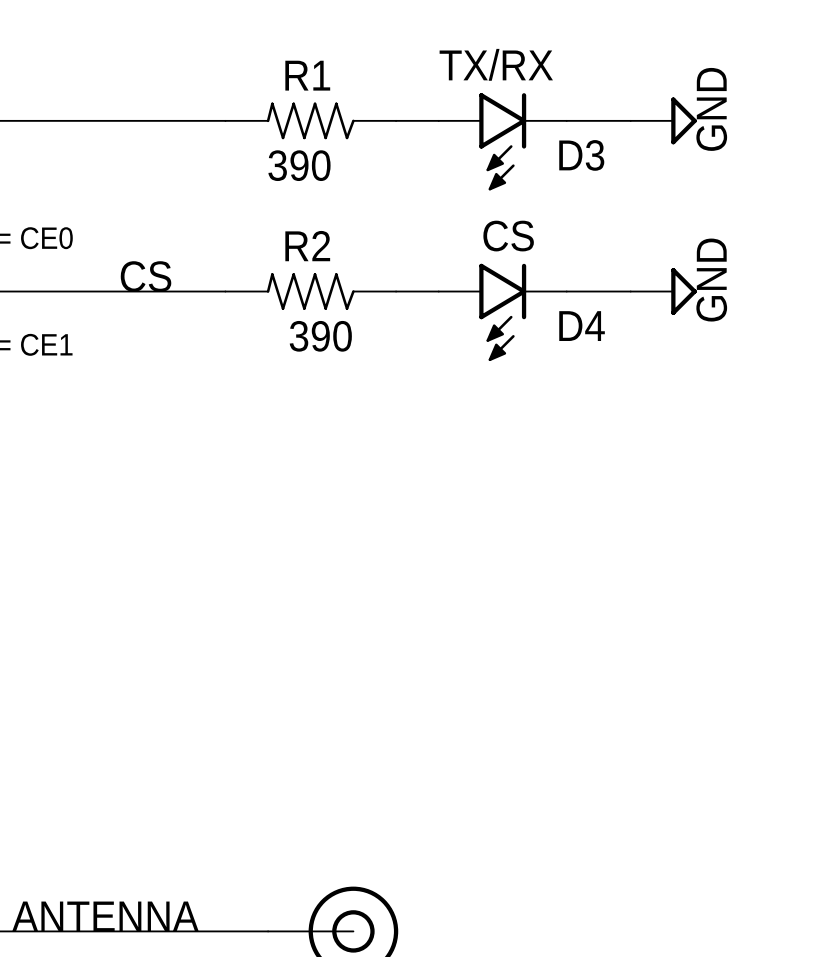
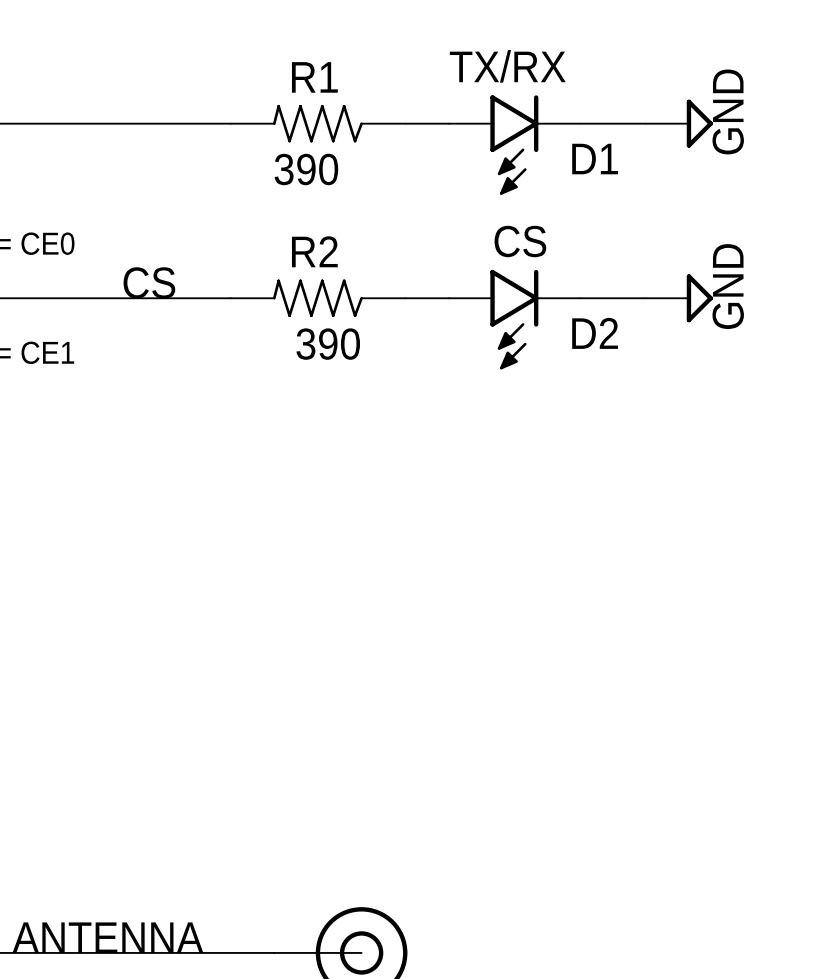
D3 name: D3 (581, 155) -> D1 (595, 159)
D4 name: D4 (582, 326) -> D2 (595, 333)

